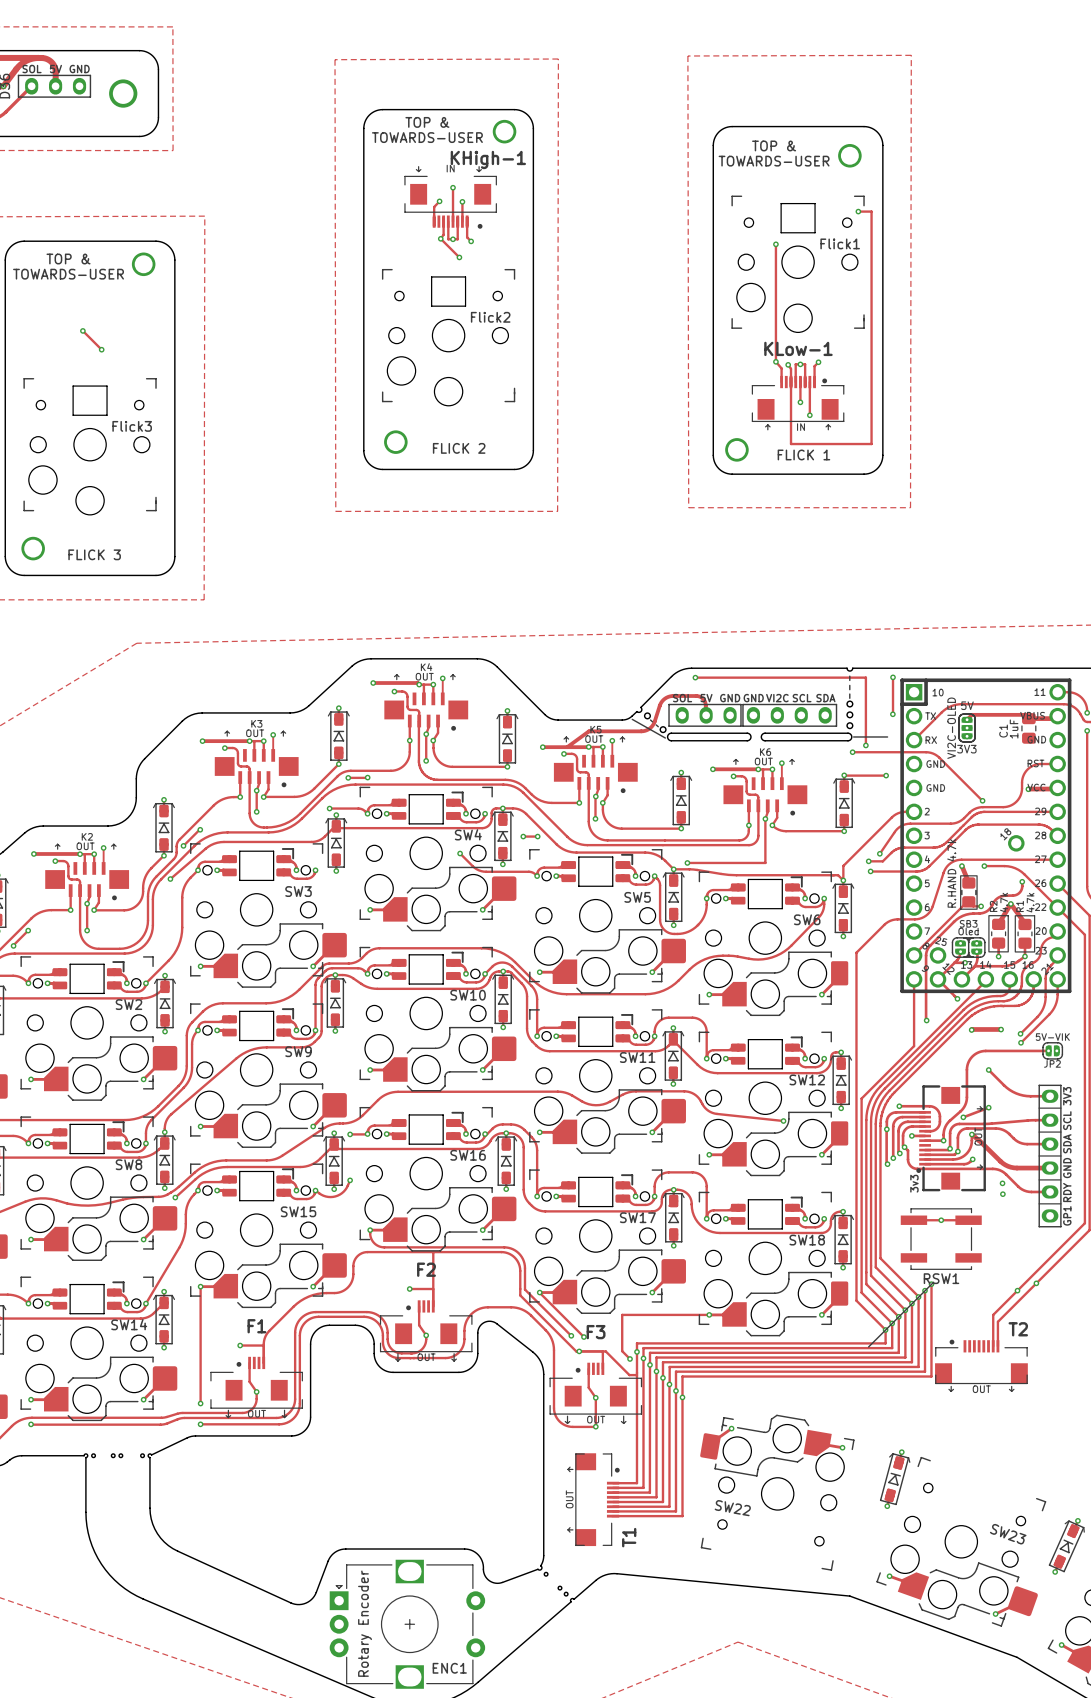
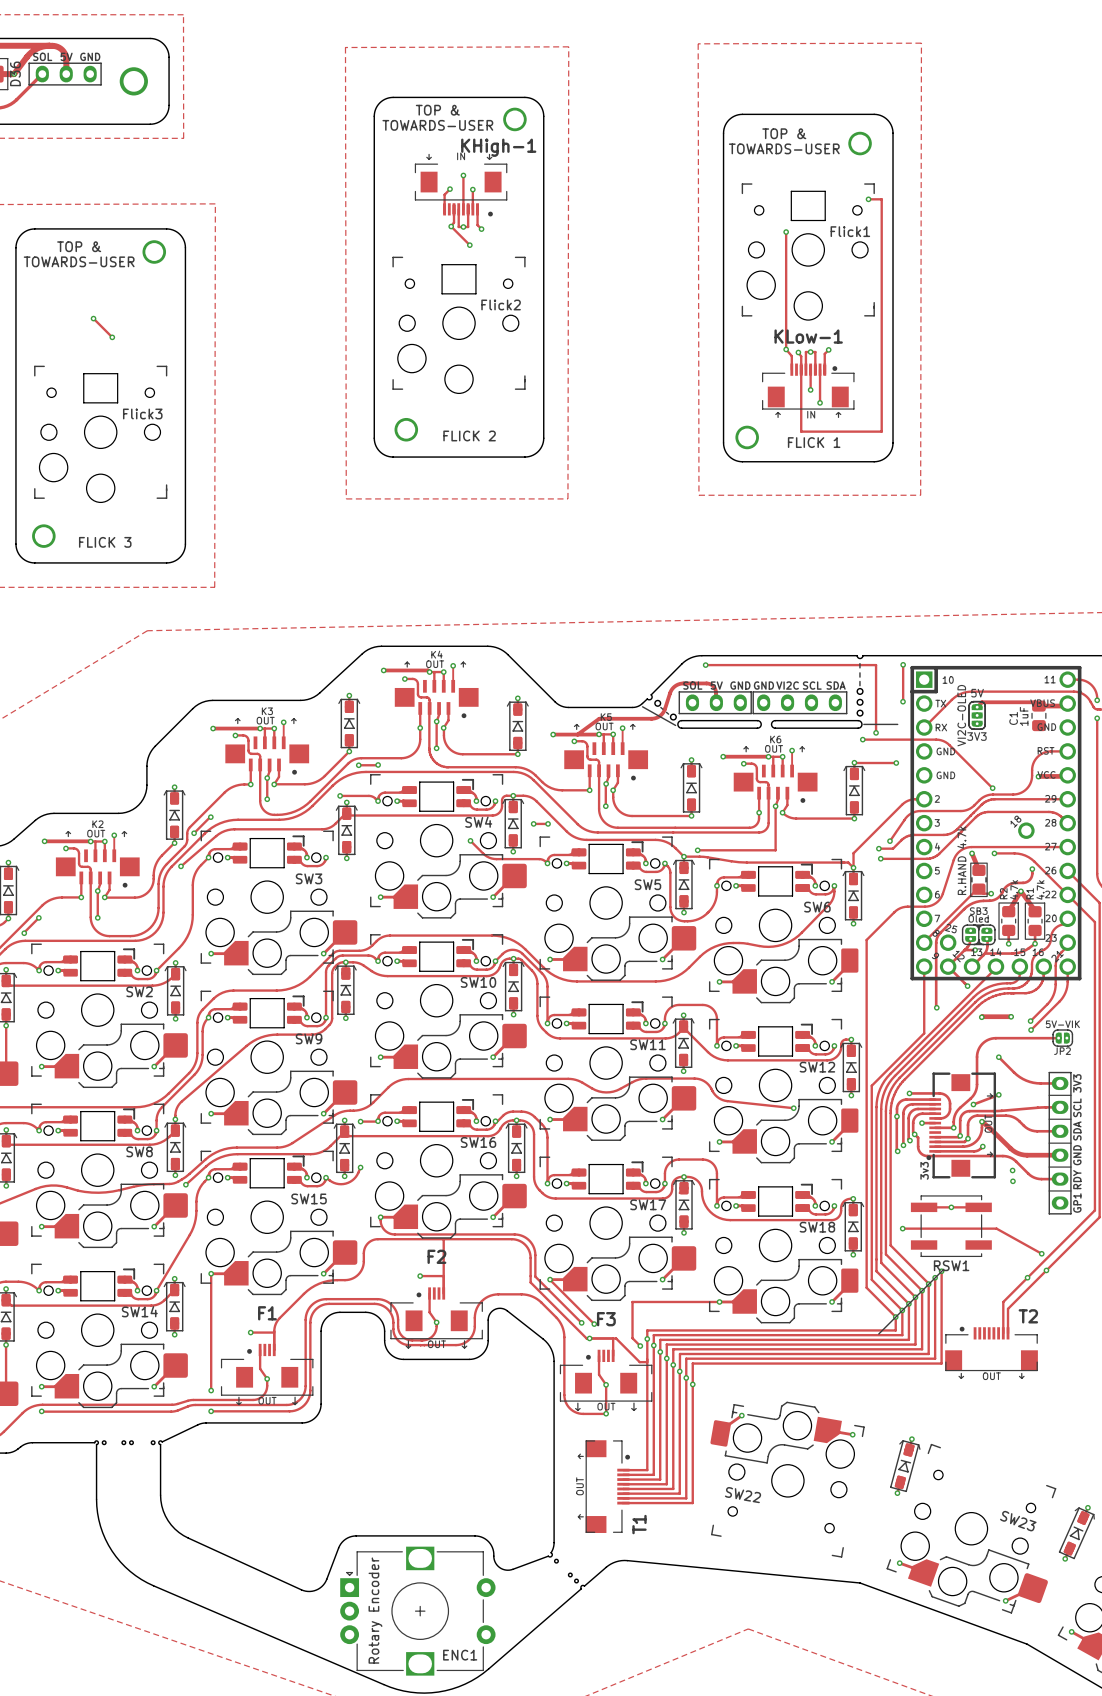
track: none -> (902, 1228) (996, 1228) (1041, 1253)
via: none -> (902, 1228)
via: none -> (1041, 1253)

